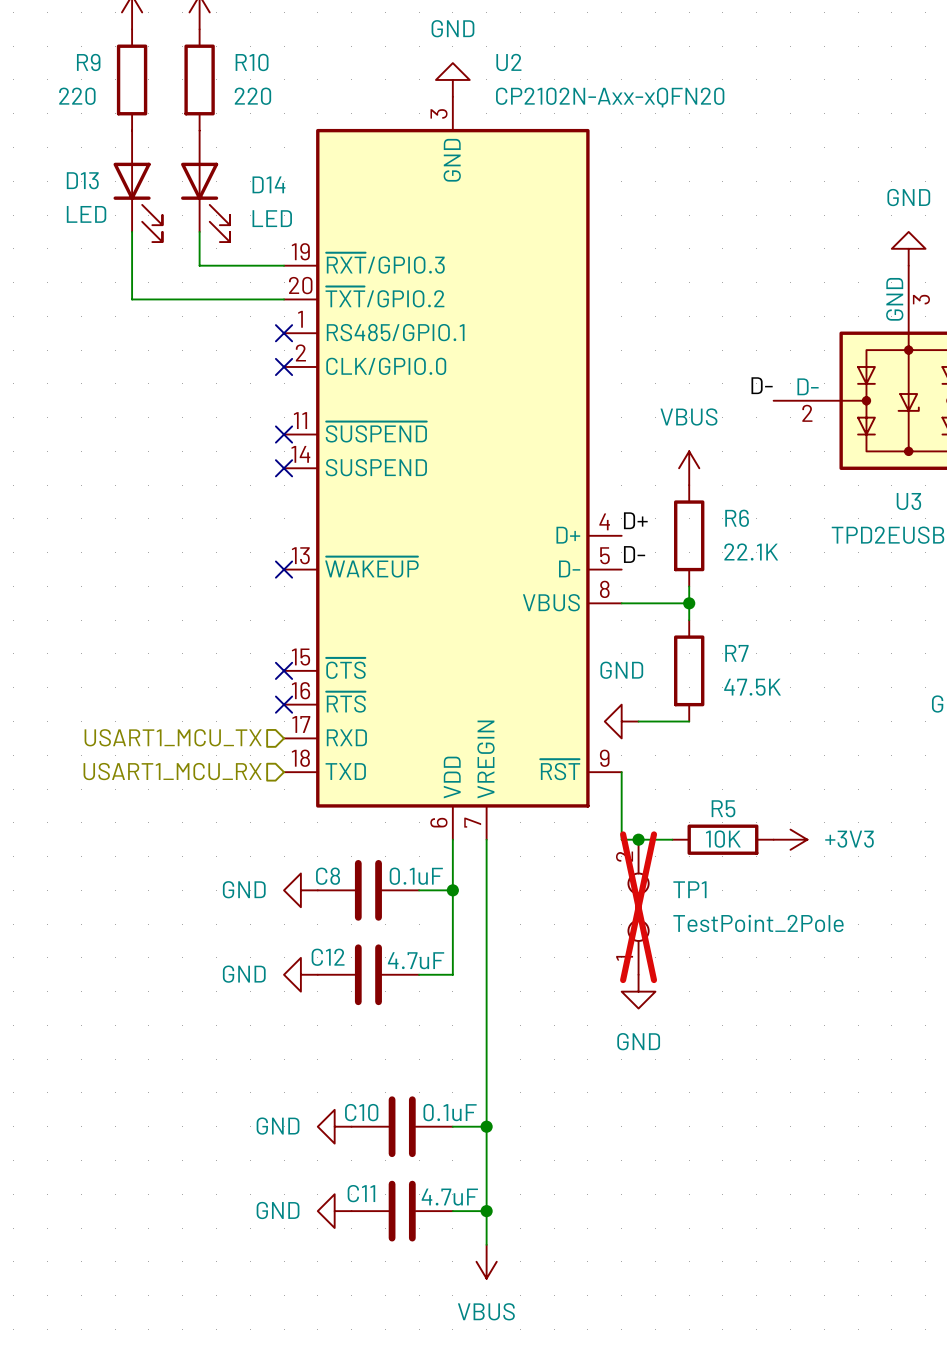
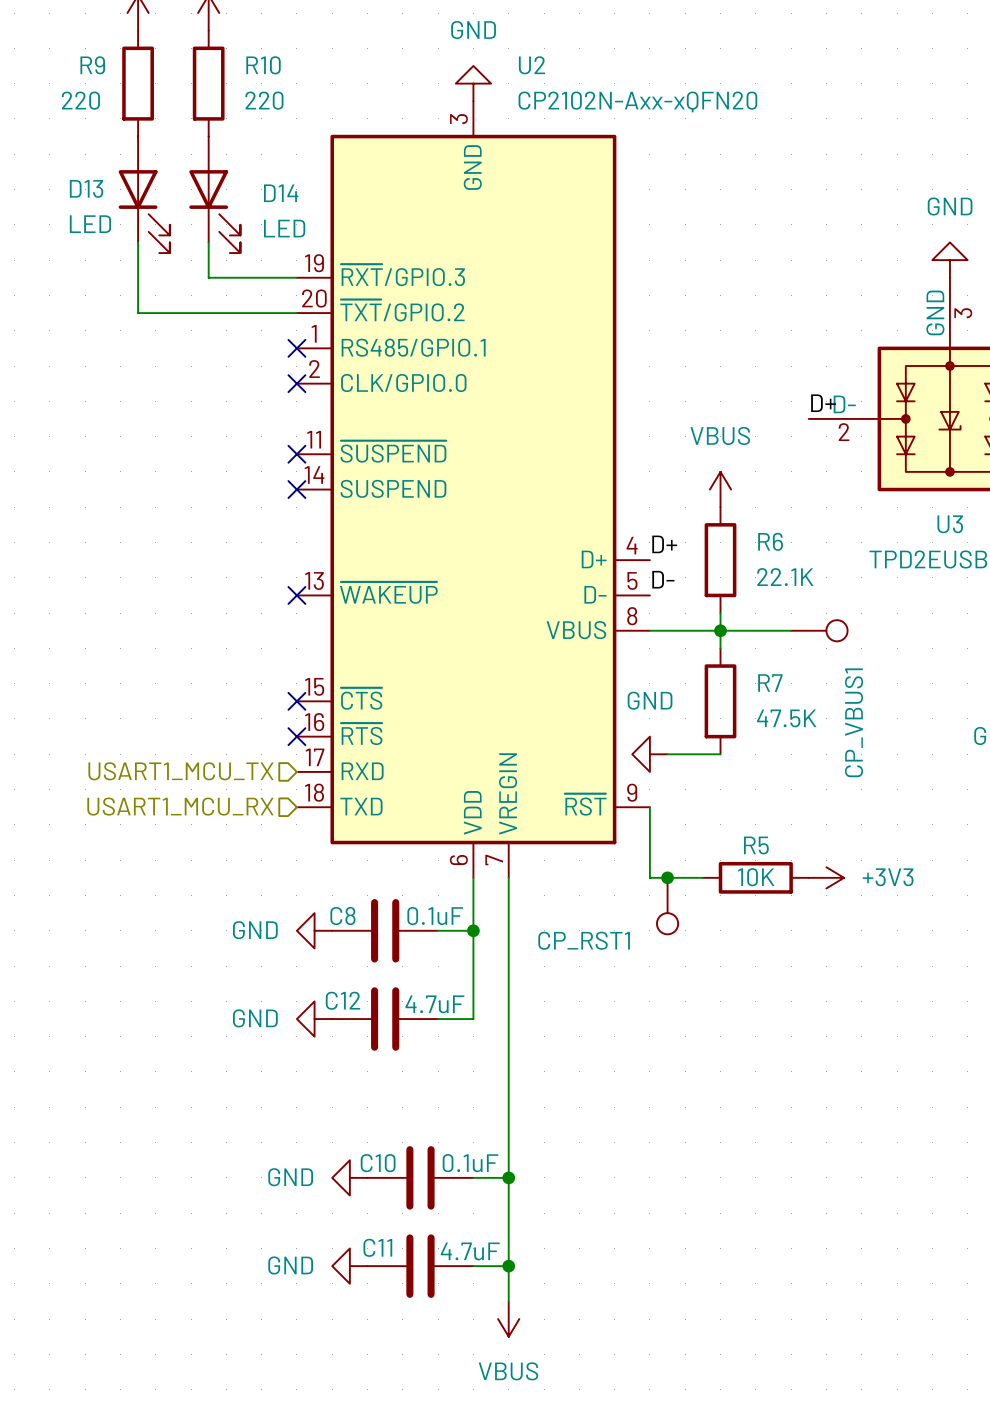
label: D- (762, 385) -> D+ (823, 403)
wire: none -> (720, 630) (791, 630)
CP_VBUS1: none -> (819, 630)
CP_RST1: none -> (667, 906)
TP1: TestPoint_2Pole (638, 907) -> none
power symbol: GND (638, 991) -> none

